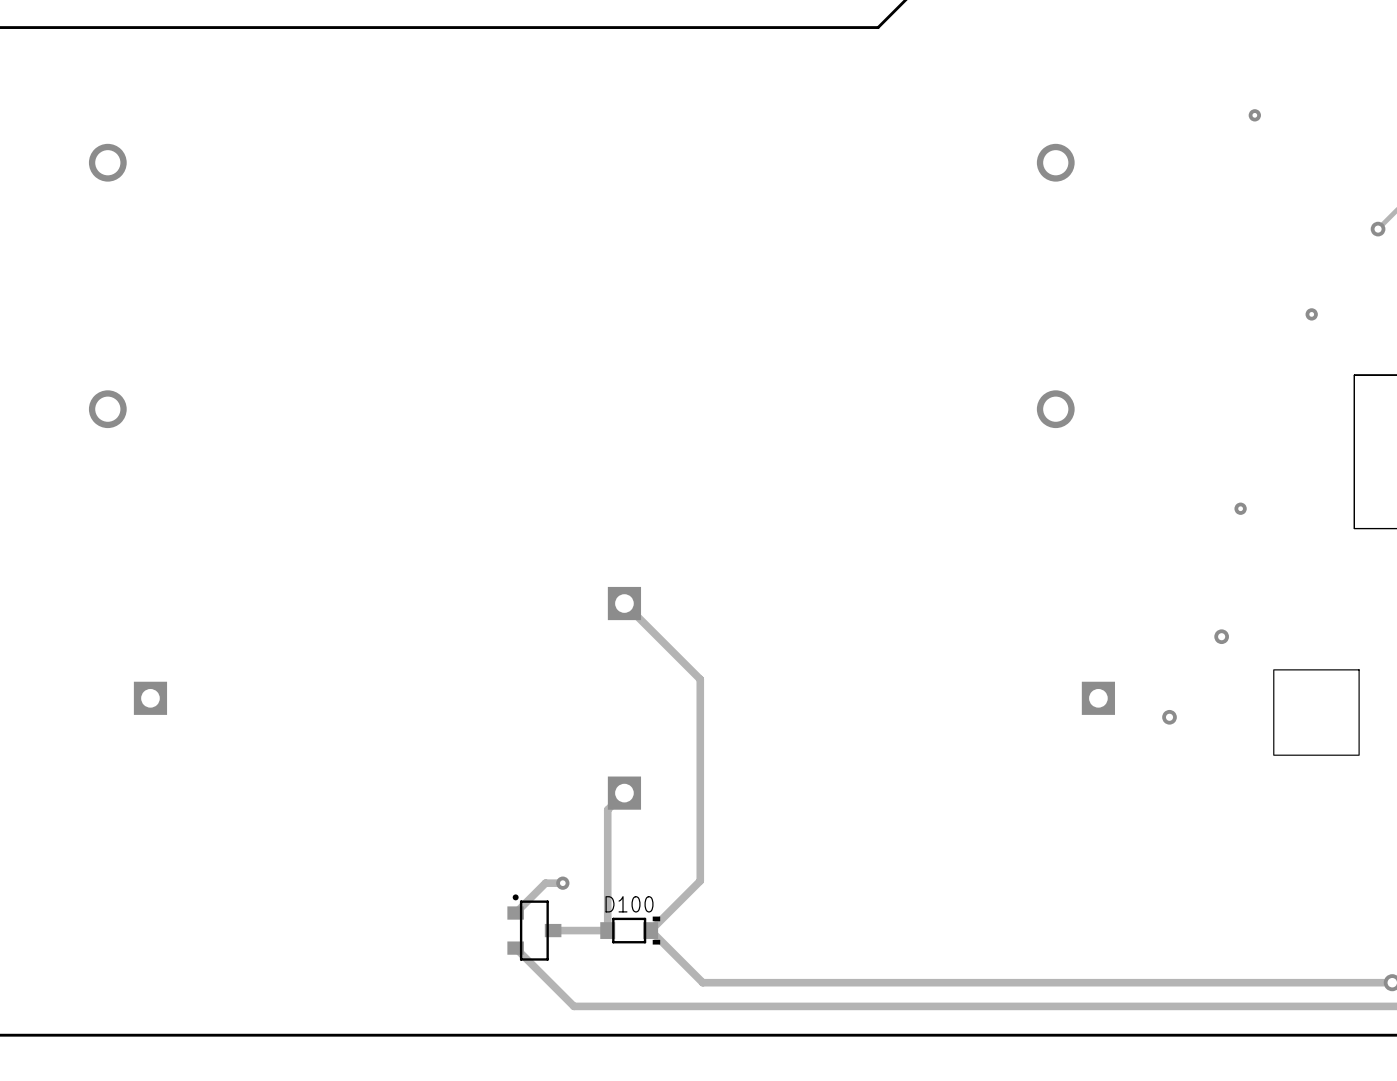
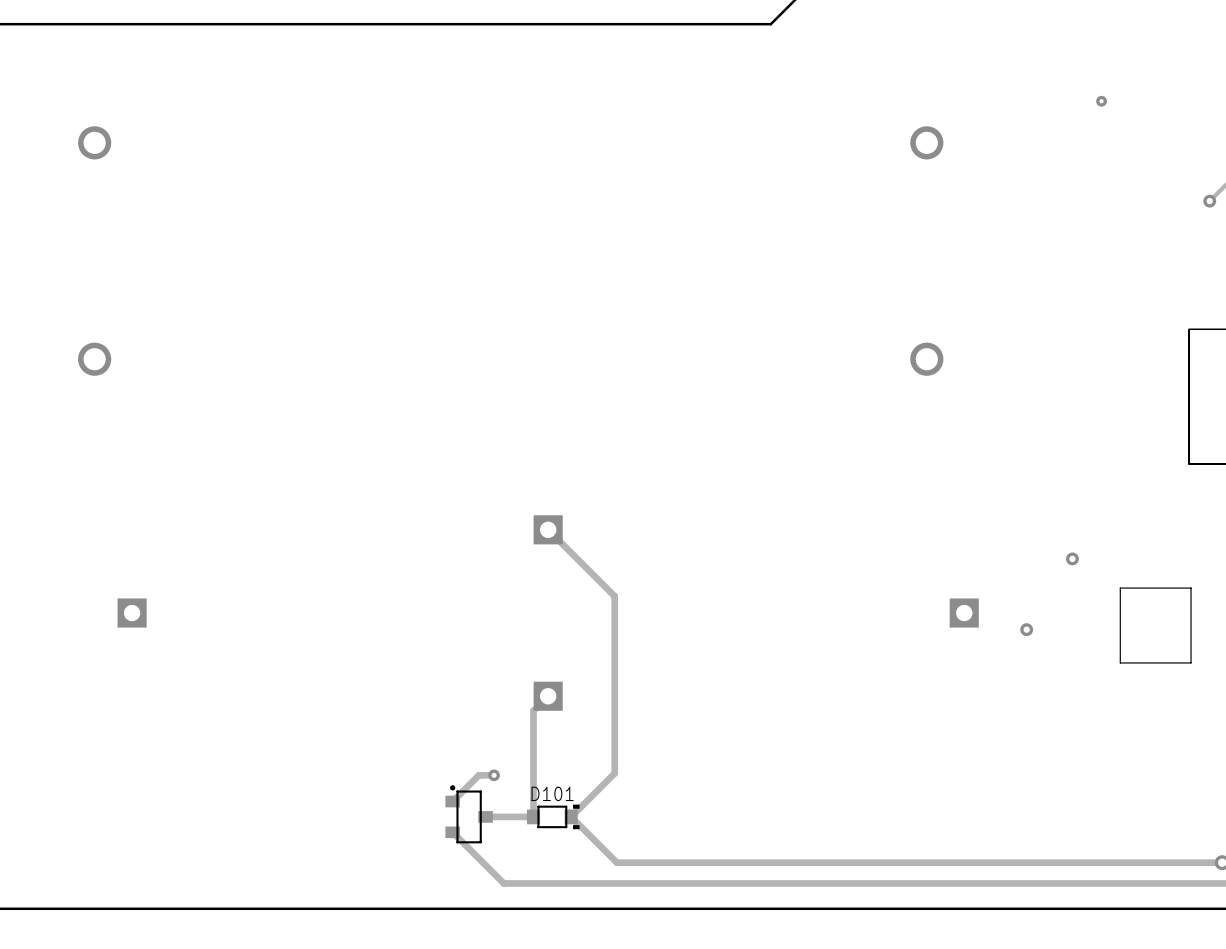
via: (1311, 314) -> none
via: (1240, 508) -> none
board edge: none -> (1191, 588) (1120, 588) (1120, 662) (1191, 662) (1191, 588)
part: (1316, 712) -> none
D100 name: D100 (629, 904) -> D101 (552, 793)

